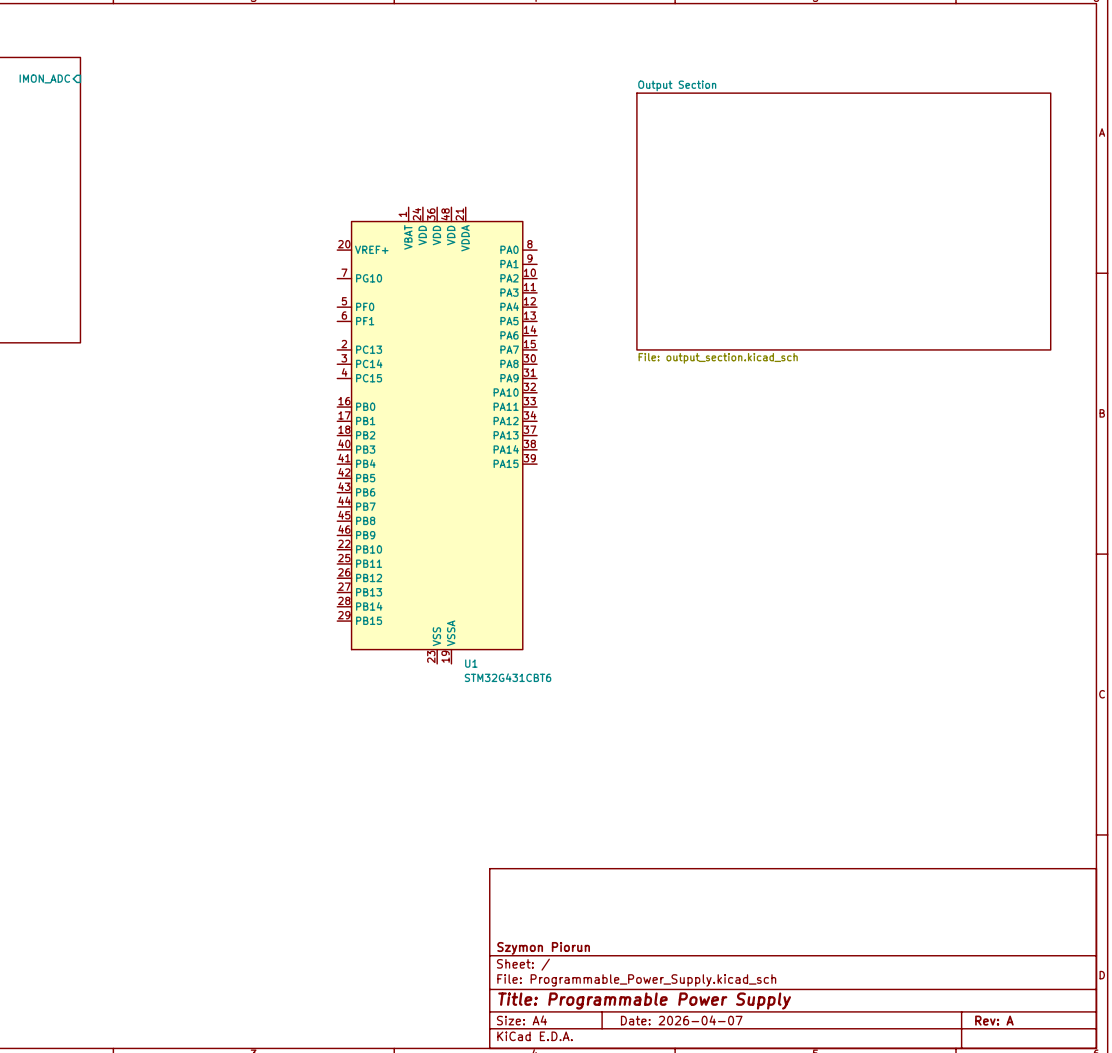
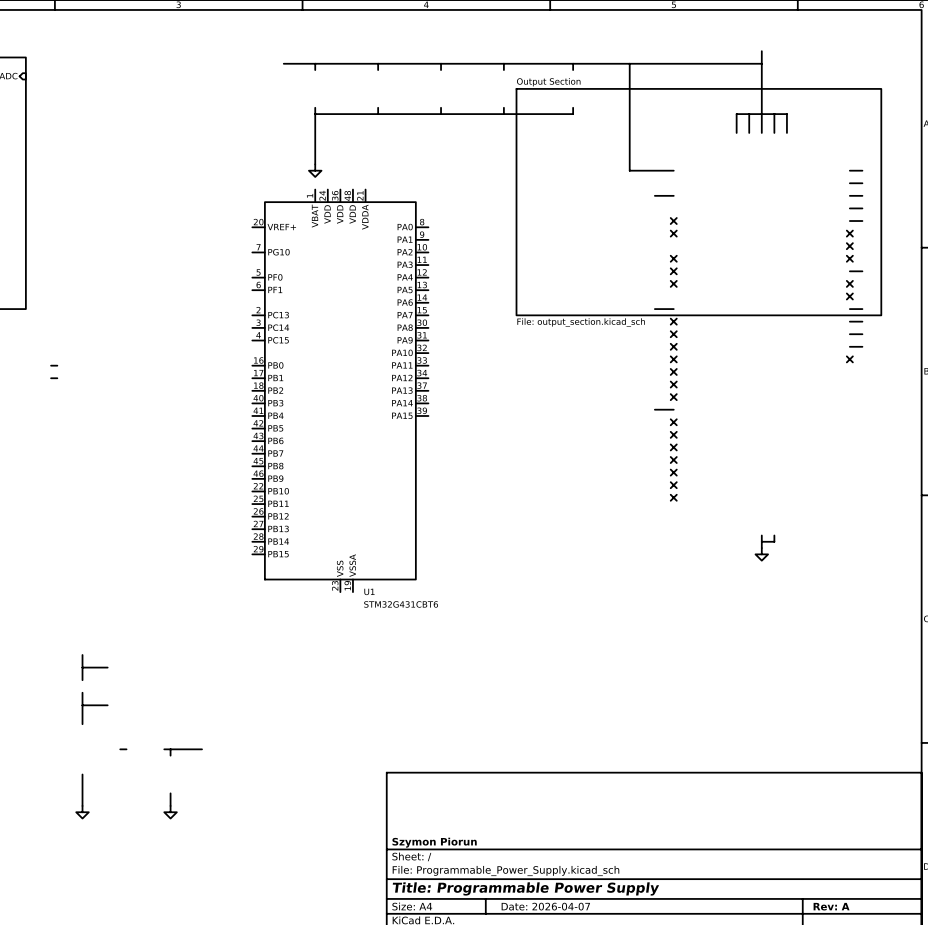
wire: none -> (761, 51) (761, 132)
wire: none -> (283, 63) (761, 63)
wire: none -> (315, 63) (315, 70)
wire: none -> (378, 63) (378, 70)
wire: none -> (441, 63) (441, 70)
wire: none -> (503, 63) (503, 70)
wire: none -> (573, 63) (573, 70)
wire: none -> (629, 63) (629, 170) (673, 170)
wire: none -> (315, 107) (315, 164)
wire: none -> (378, 107) (378, 114)
wire: none -> (441, 107) (441, 114)
wire: none -> (503, 107) (503, 114)
wire: none -> (573, 107) (573, 114) (315, 114)
wire: none -> (749, 114) (749, 132)
wire: none -> (774, 114) (774, 132)
wire: none -> (736, 132) (736, 114) (786, 114) (786, 132)
power symbol: none -> (315, 170)
wire: none -> (849, 170) (862, 170)
wire: none -> (849, 183) (862, 183)
wire: none -> (654, 195) (673, 195)
wire: none -> (849, 195) (862, 195)
wire: none -> (849, 208) (862, 208)
no-connect mark: none -> (673, 221)
wire: none -> (849, 221) (862, 221)
no-connect mark: none -> (673, 233)
no-connect mark: none -> (849, 233)
no-connect mark: none -> (849, 246)
no-connect mark: none -> (673, 258)
no-connect mark: none -> (849, 258)
no-connect mark: none -> (673, 271)
wire: none -> (849, 271) (862, 271)
no-connect mark: none -> (673, 283)
no-connect mark: none -> (849, 283)
no-connect mark: none -> (849, 296)
wire: none -> (654, 309) (673, 309)
wire: none -> (849, 309) (862, 309)
no-connect mark: none -> (673, 321)
wire: none -> (849, 321) (862, 321)
no-connect mark: none -> (673, 334)
wire: none -> (849, 334) (862, 334)
no-connect mark: none -> (673, 346)
wire: none -> (849, 346) (862, 346)
no-connect mark: none -> (673, 359)
no-connect mark: none -> (849, 359)
wire: none -> (51, 365) (57, 365)
no-connect mark: none -> (673, 371)
wire: none -> (51, 378) (57, 378)
no-connect mark: none -> (673, 384)
no-connect mark: none -> (673, 397)
wire: none -> (654, 409) (673, 409)
no-connect mark: none -> (673, 422)
no-connect mark: none -> (673, 434)
no-connect mark: none -> (673, 447)
no-connect mark: none -> (673, 460)
no-connect mark: none -> (673, 472)
no-connect mark: none -> (673, 485)
no-connect mark: none -> (673, 497)
wire: none -> (761, 535) (761, 548)
wire: none -> (774, 535) (774, 541) (761, 541)
power symbol: none -> (761, 554)
wire: none -> (82, 655) (82, 680)
wire: none -> (82, 667) (107, 667)
wire: none -> (82, 692) (82, 724)
wire: none -> (82, 705) (107, 705)
wire: none -> (120, 749) (126, 749)
wire: none -> (164, 749) (202, 749)
wire: none -> (170, 749) (170, 755)
wire: none -> (82, 774) (82, 805)
wire: none -> (170, 793) (170, 805)
power symbol: none -> (82, 812)
power symbol: none -> (170, 812)

